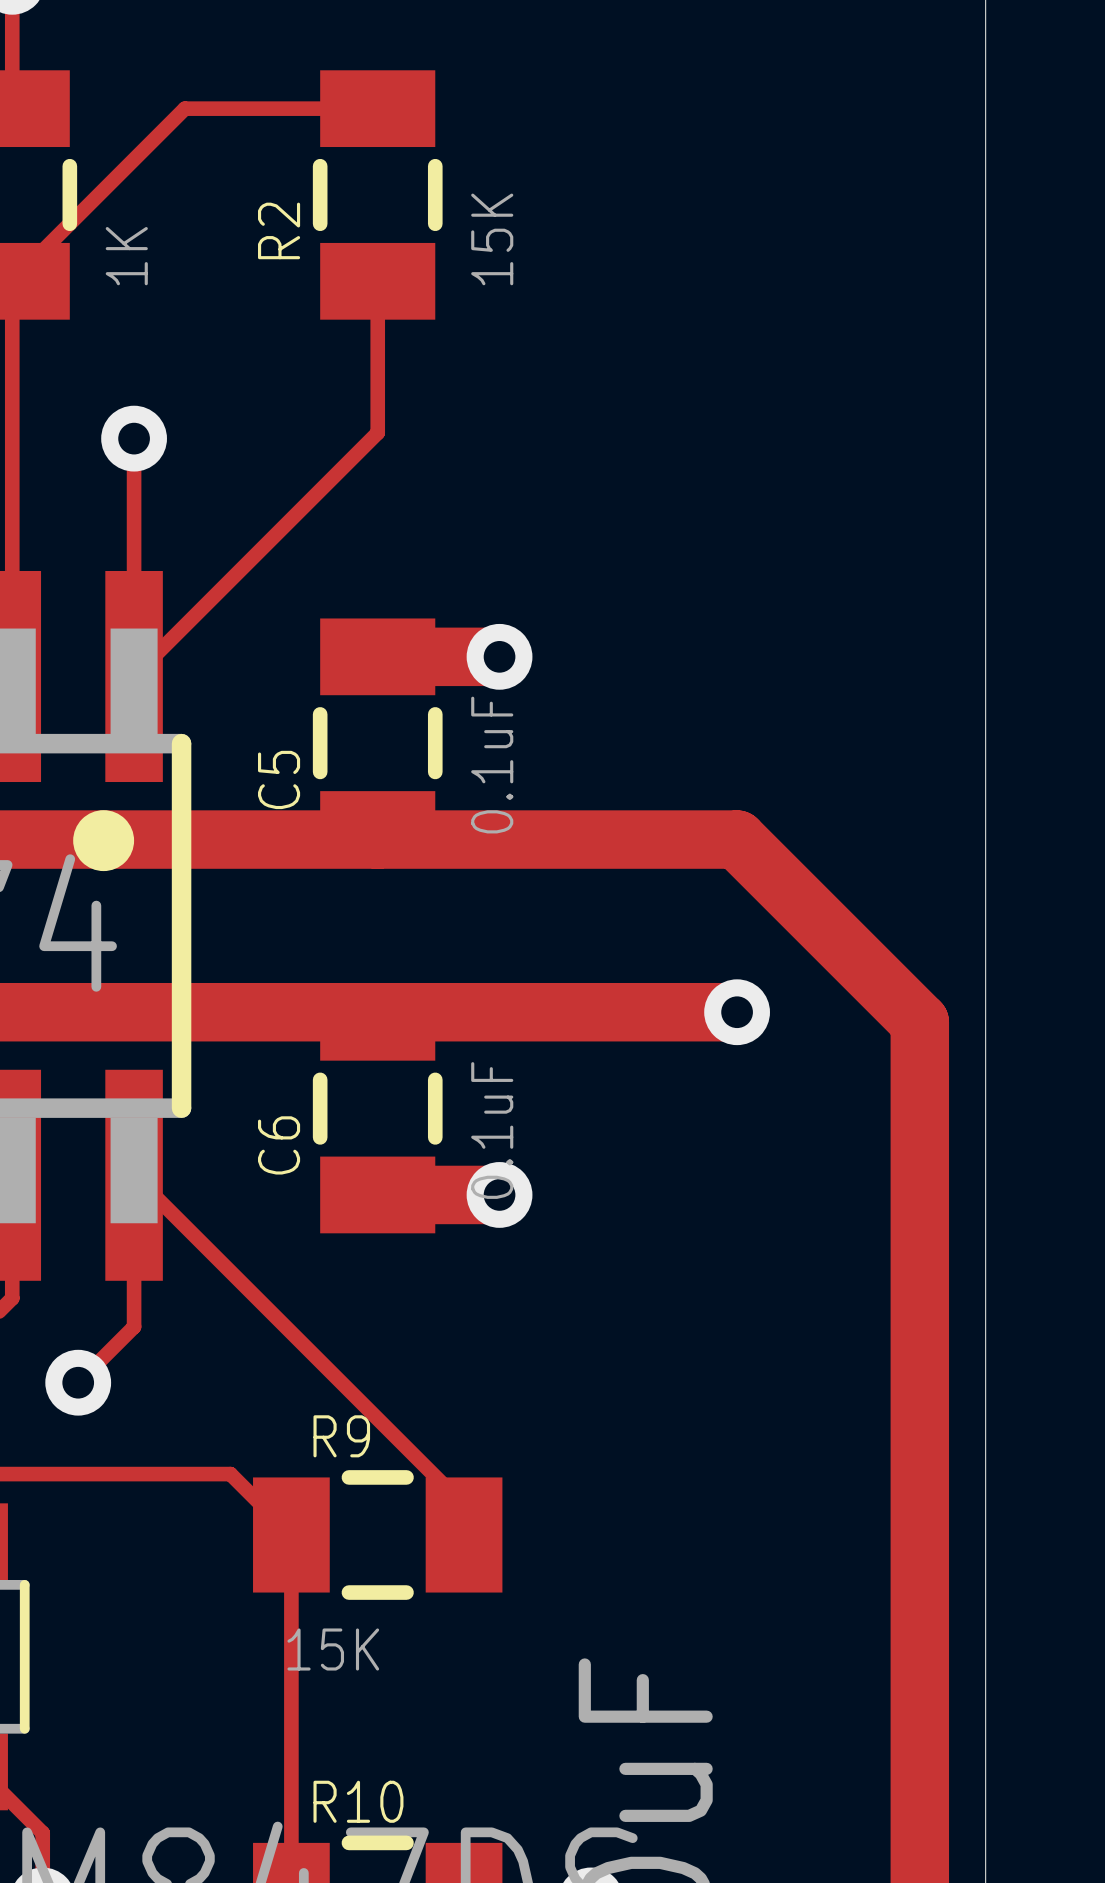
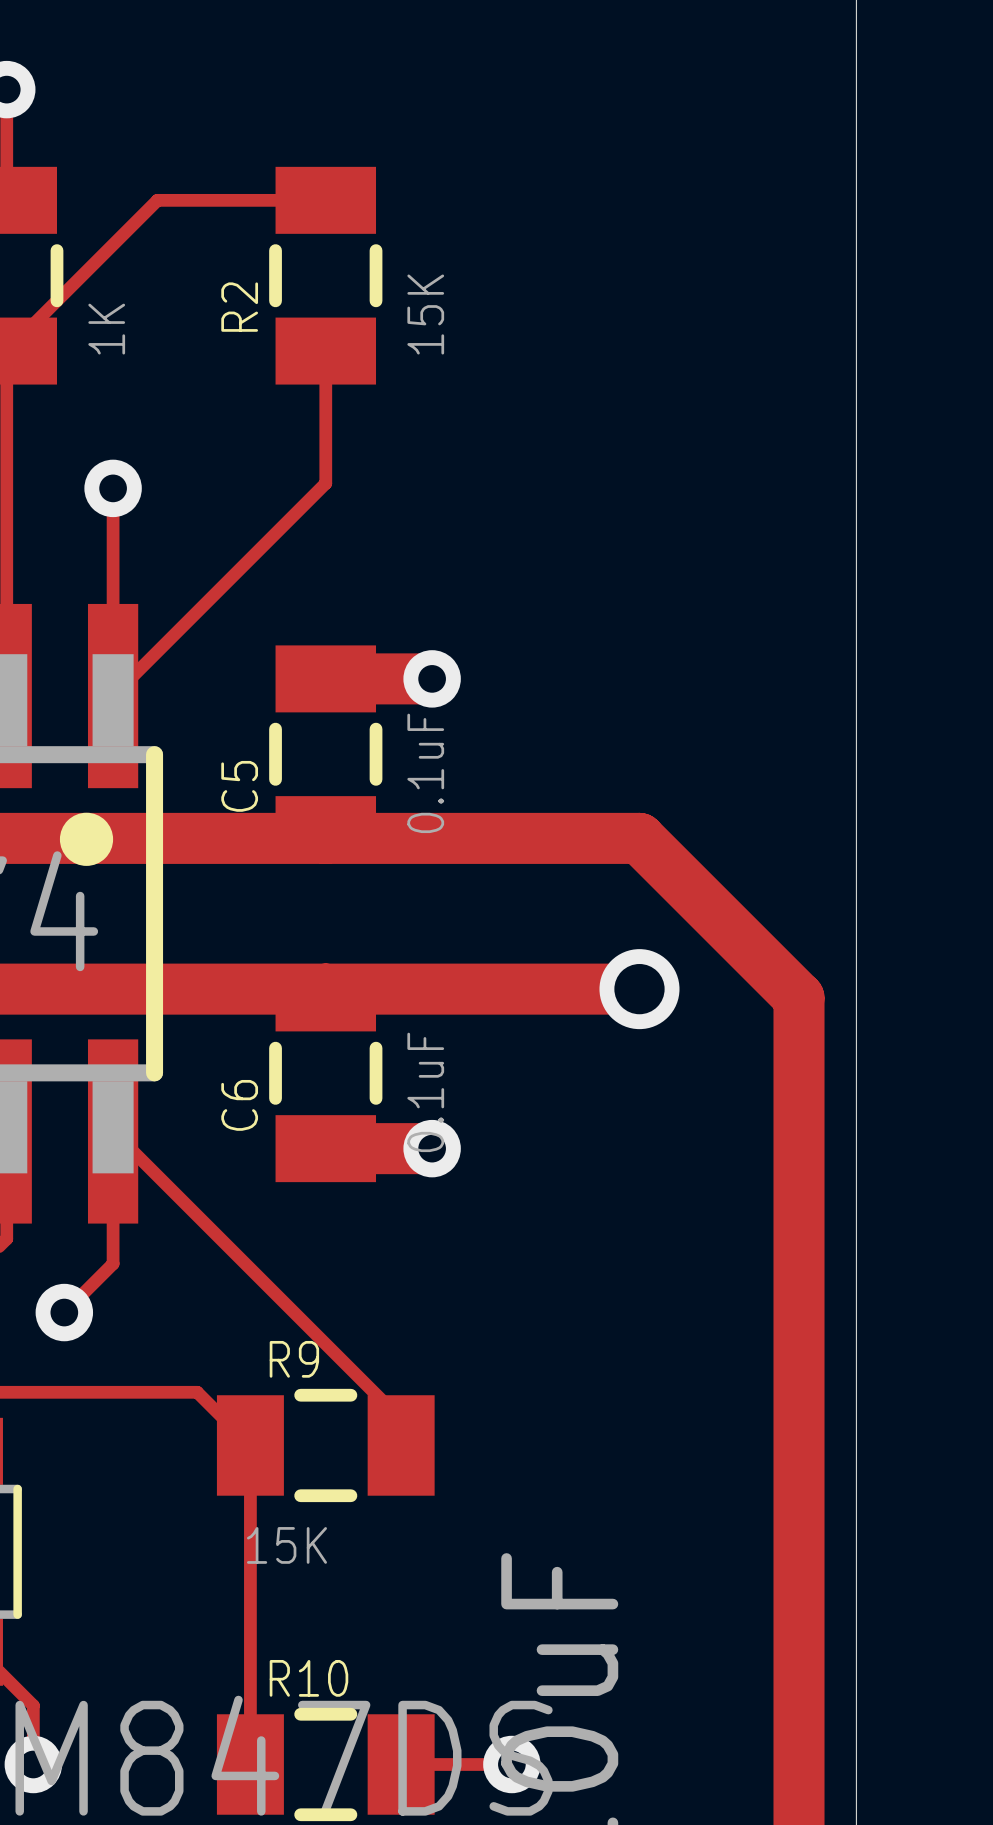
via size: [704, 979, 770, 1046] -> [599, 949, 680, 1030]

